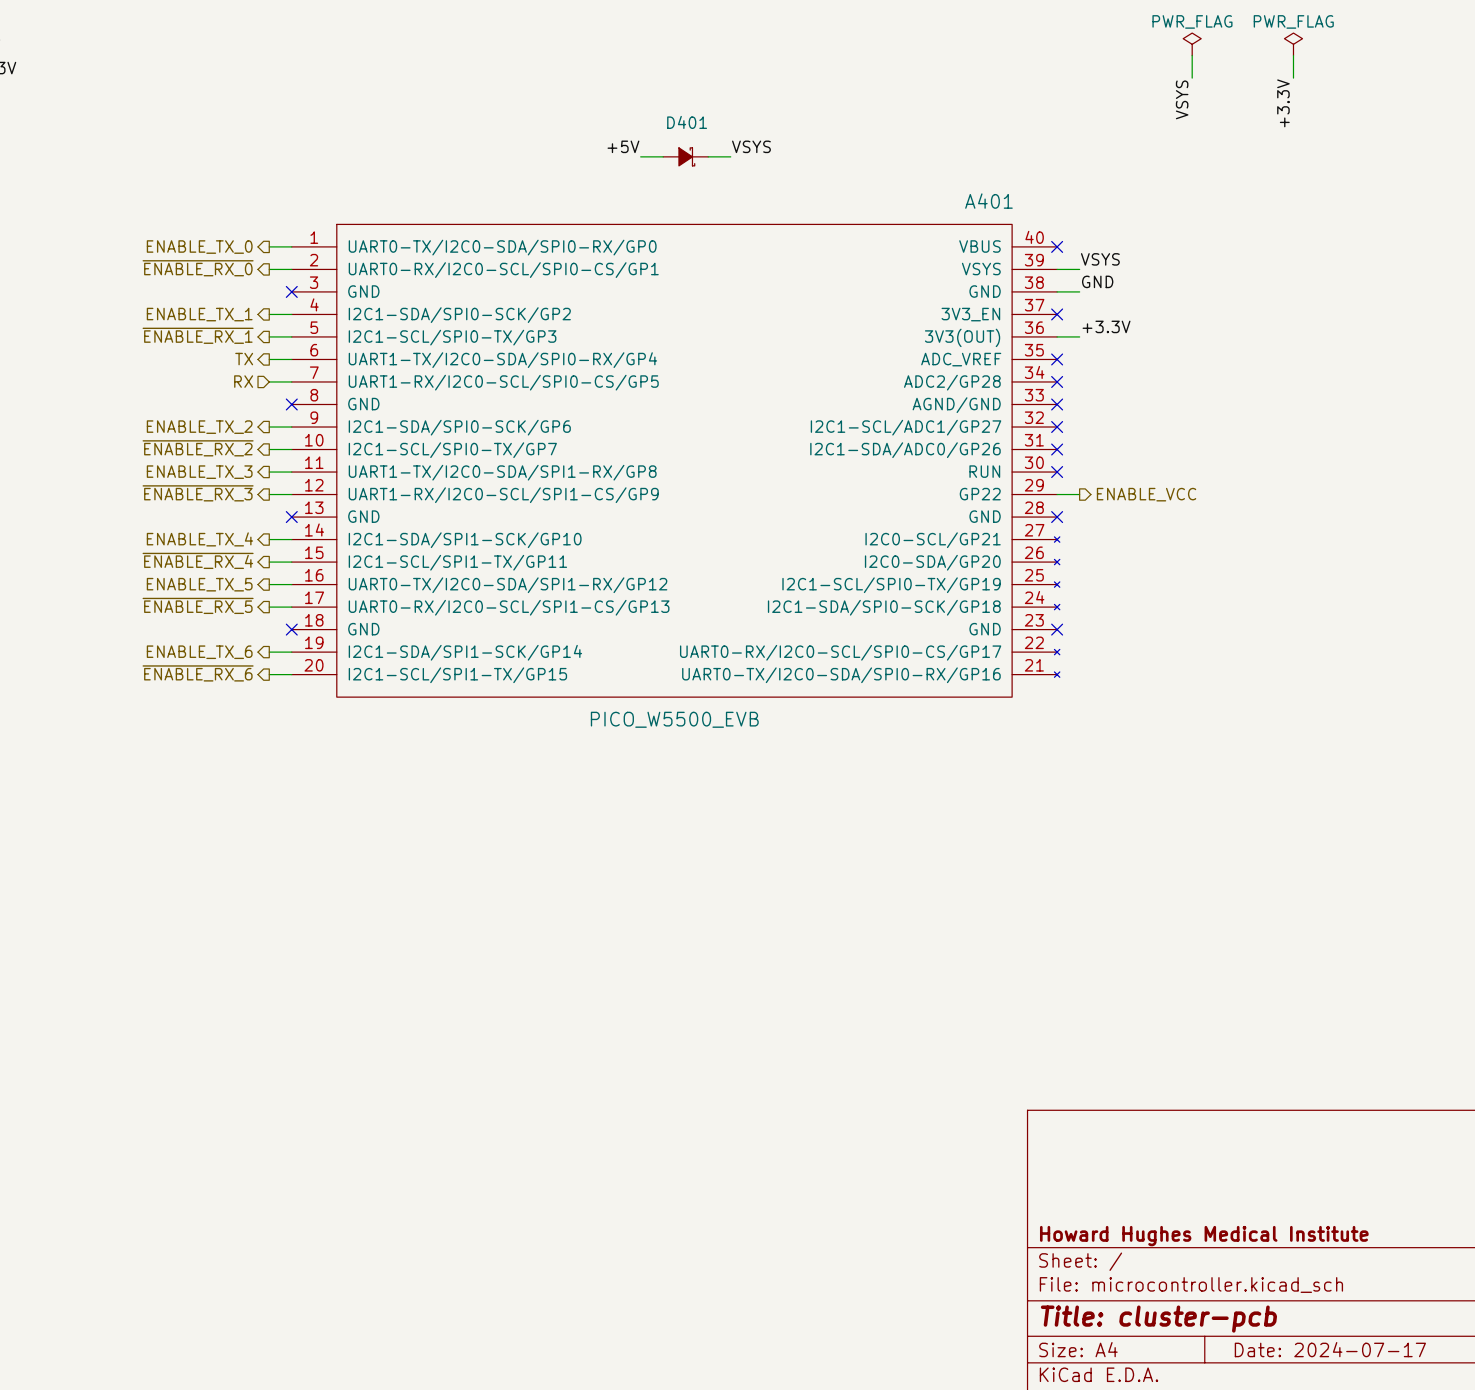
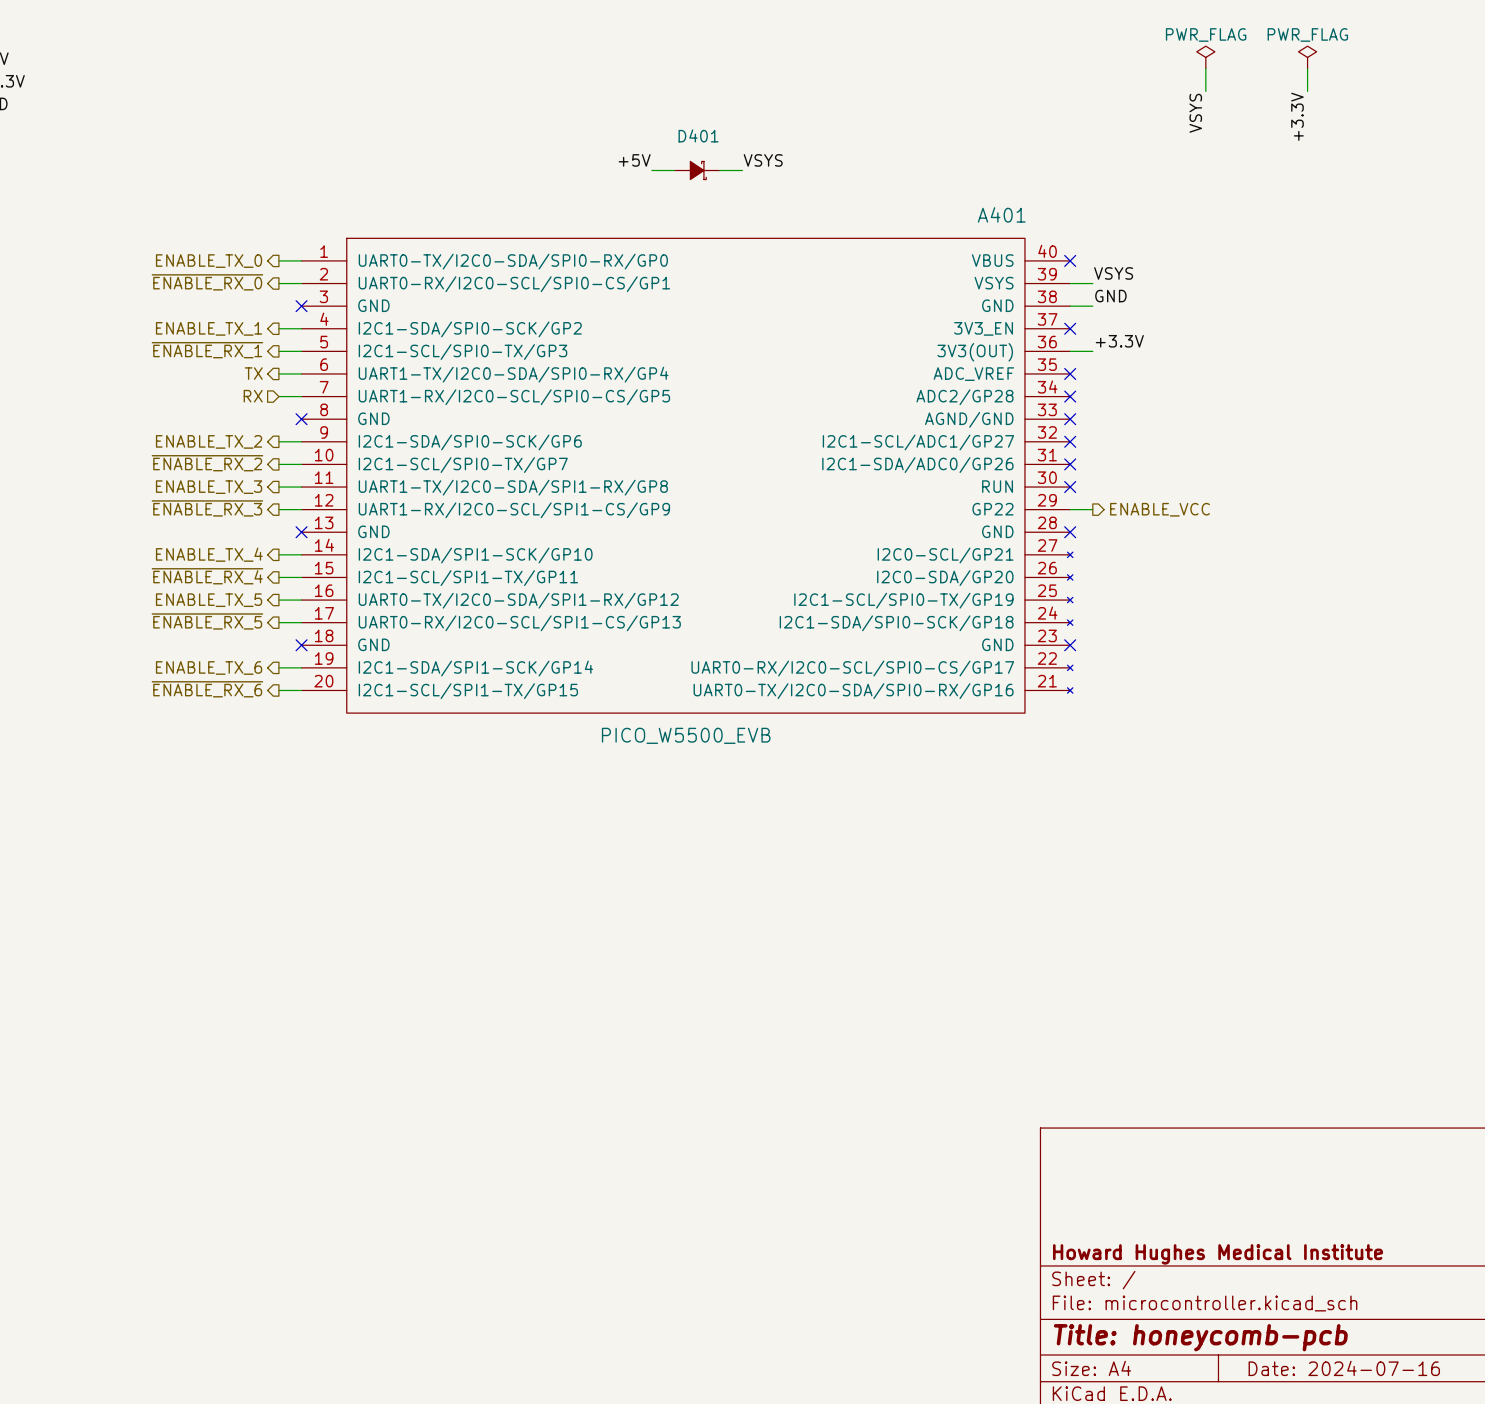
title block: Title: cluster-pcb (1158, 1319) -> Title: honeycomb-pcb (1200, 1337)
title block: Date: 2024-07-17 (1330, 1349) -> Date: 2024-07-16 (1344, 1368)

